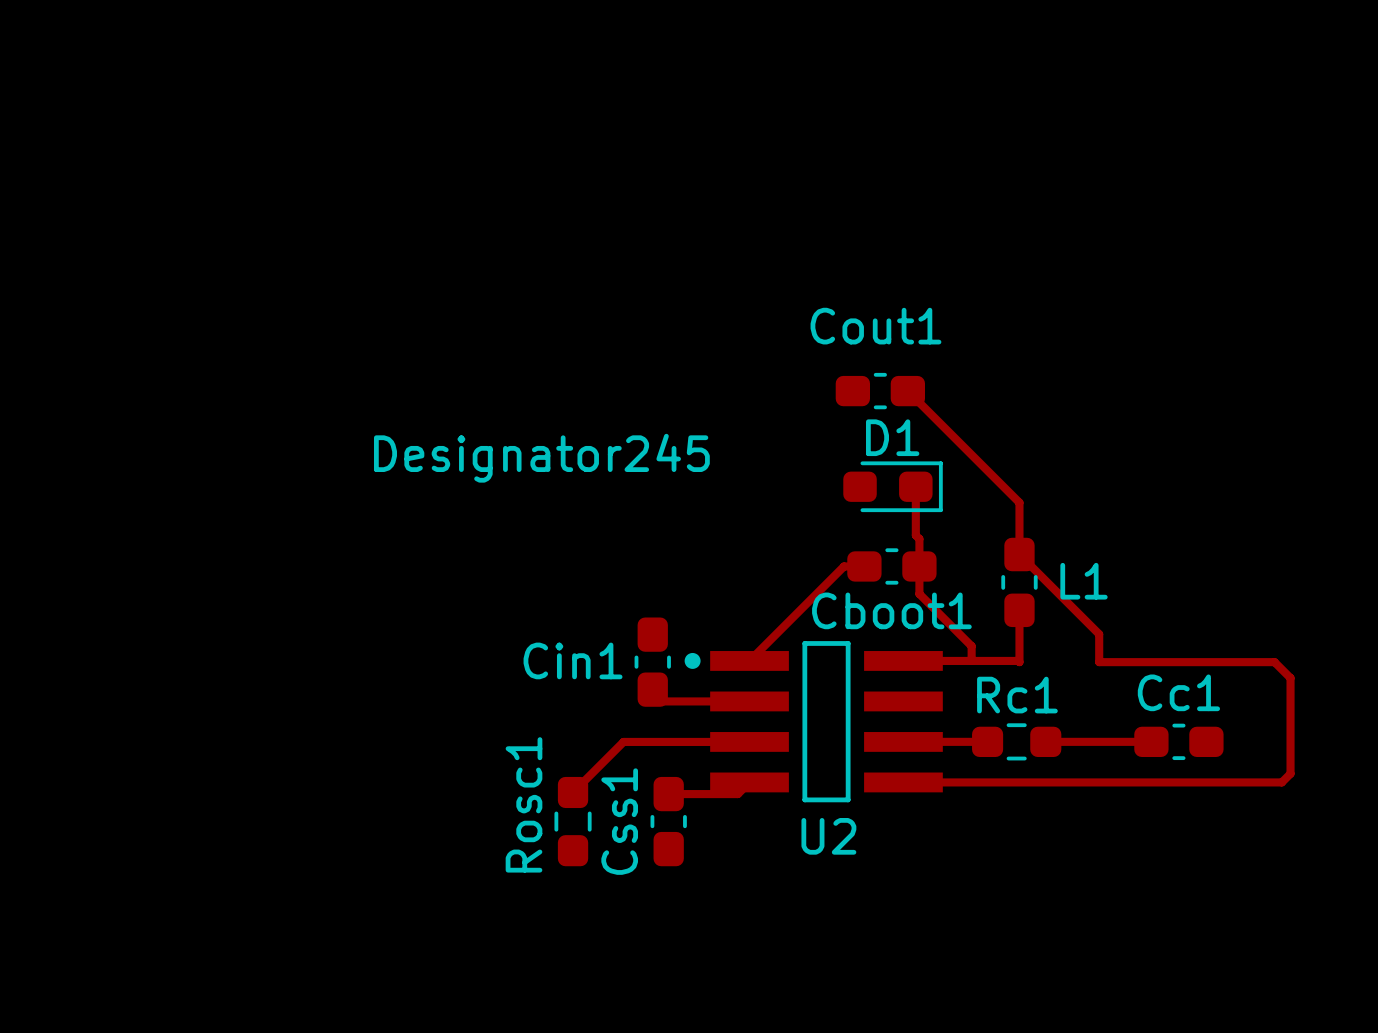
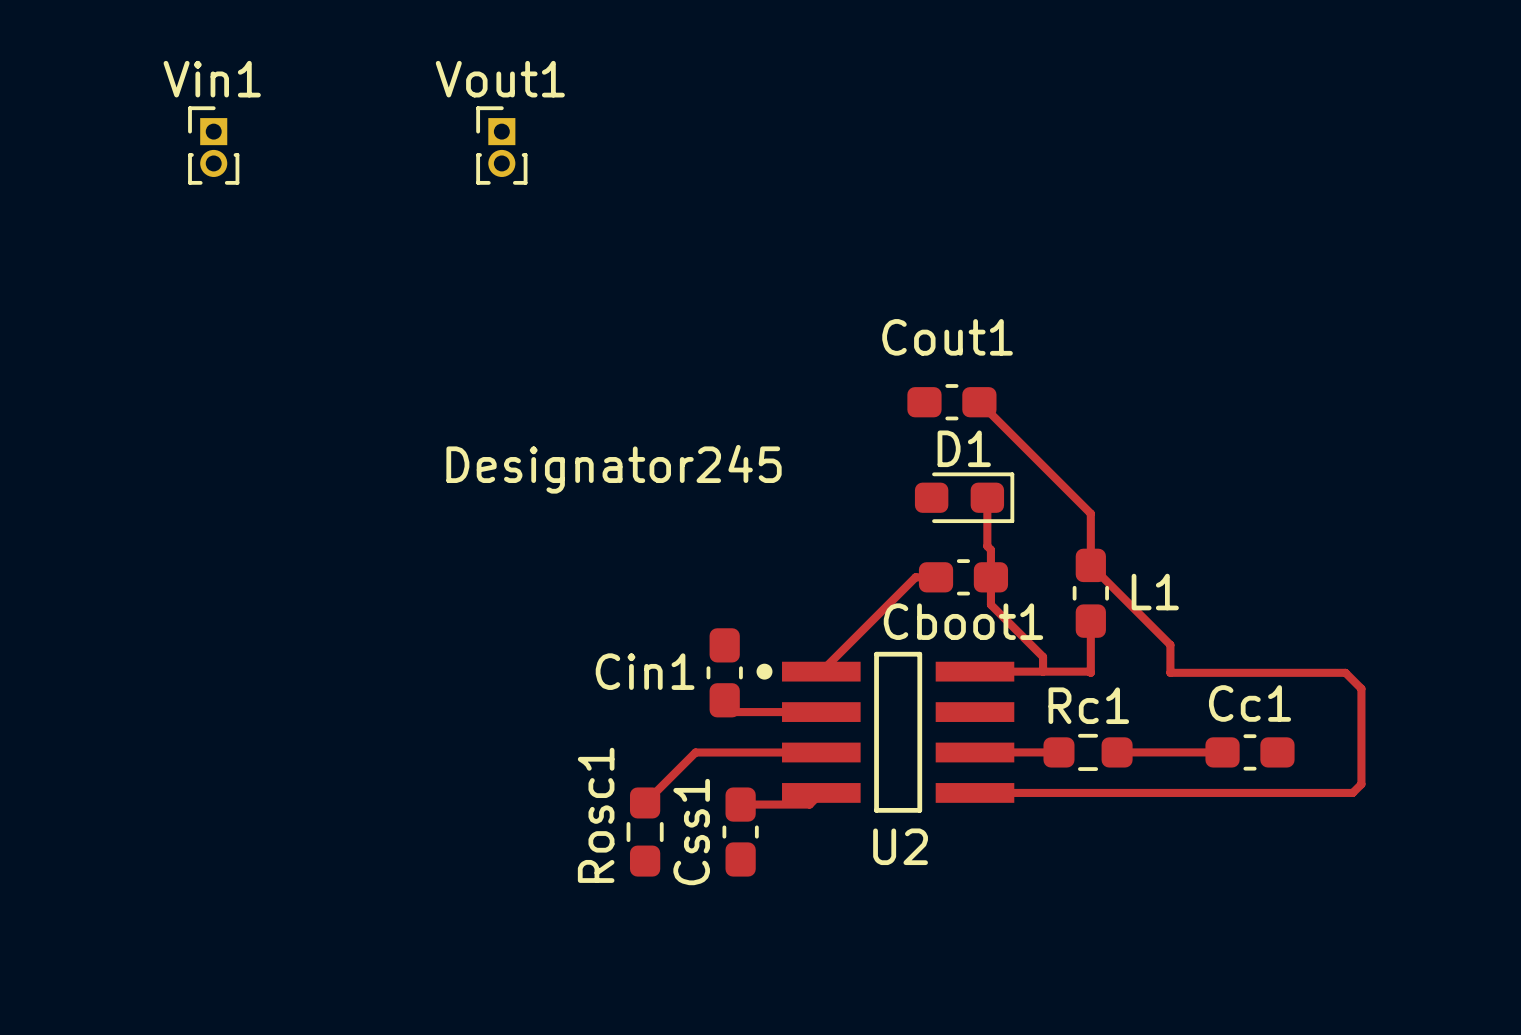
Vin1: none -> (213, 145)
Vout1: none -> (501, 145)

